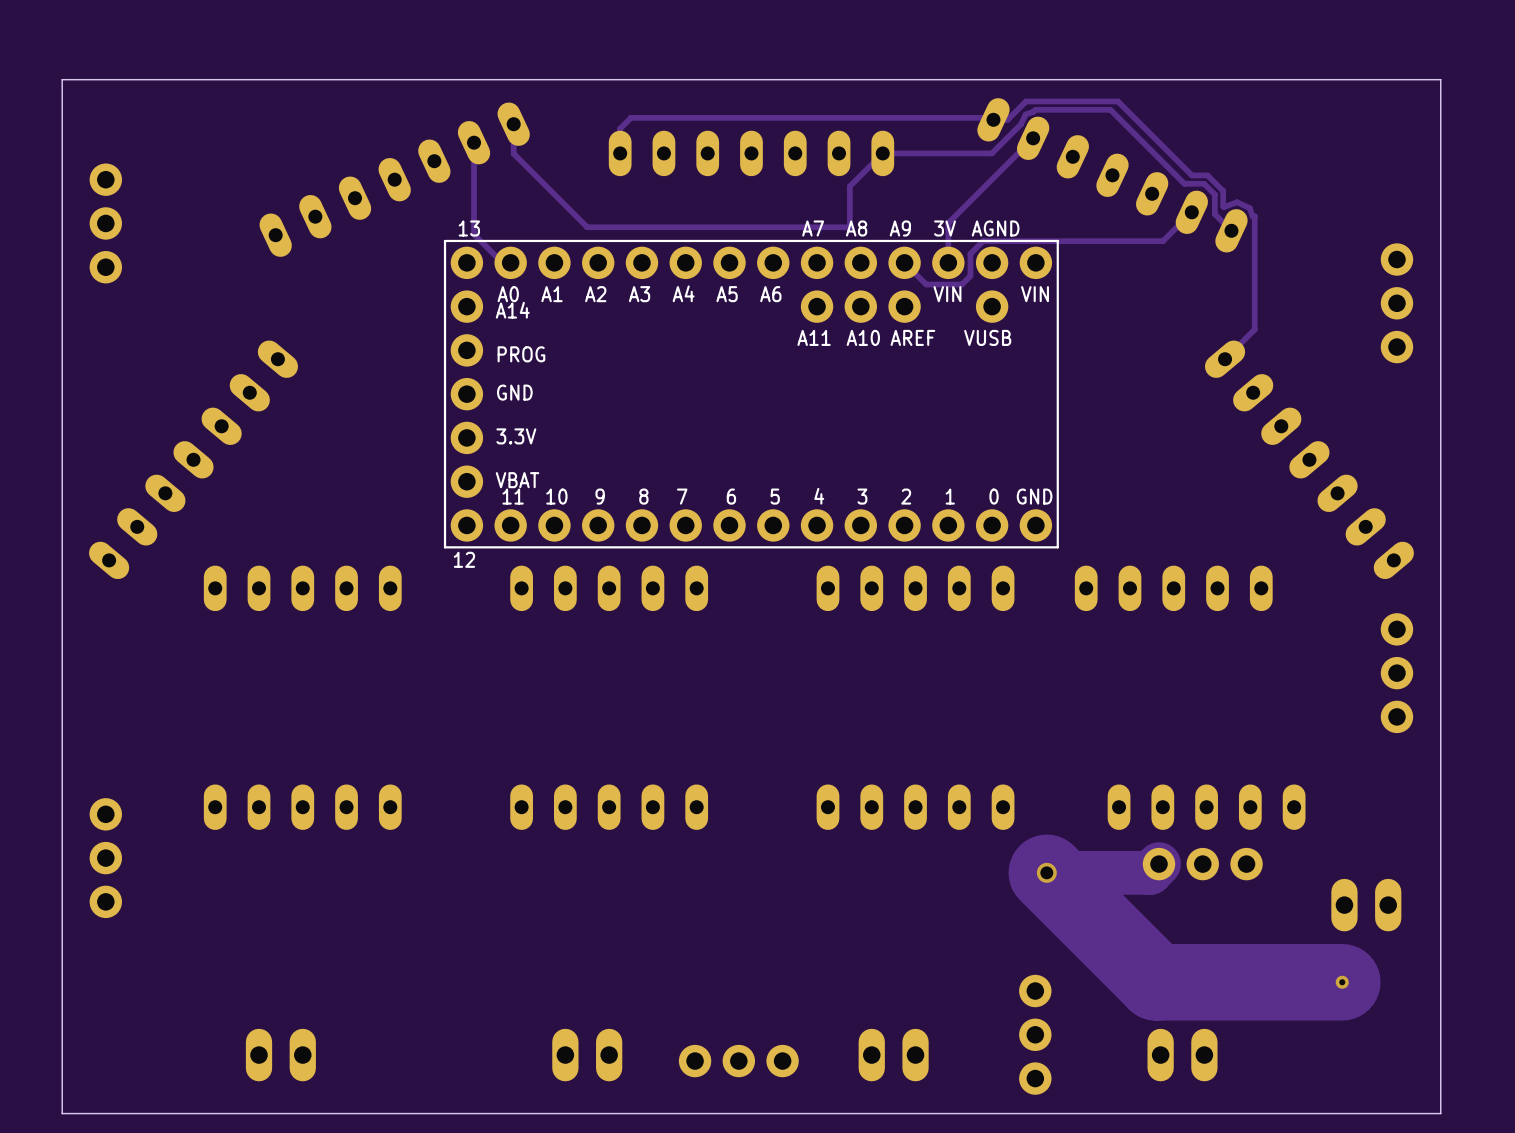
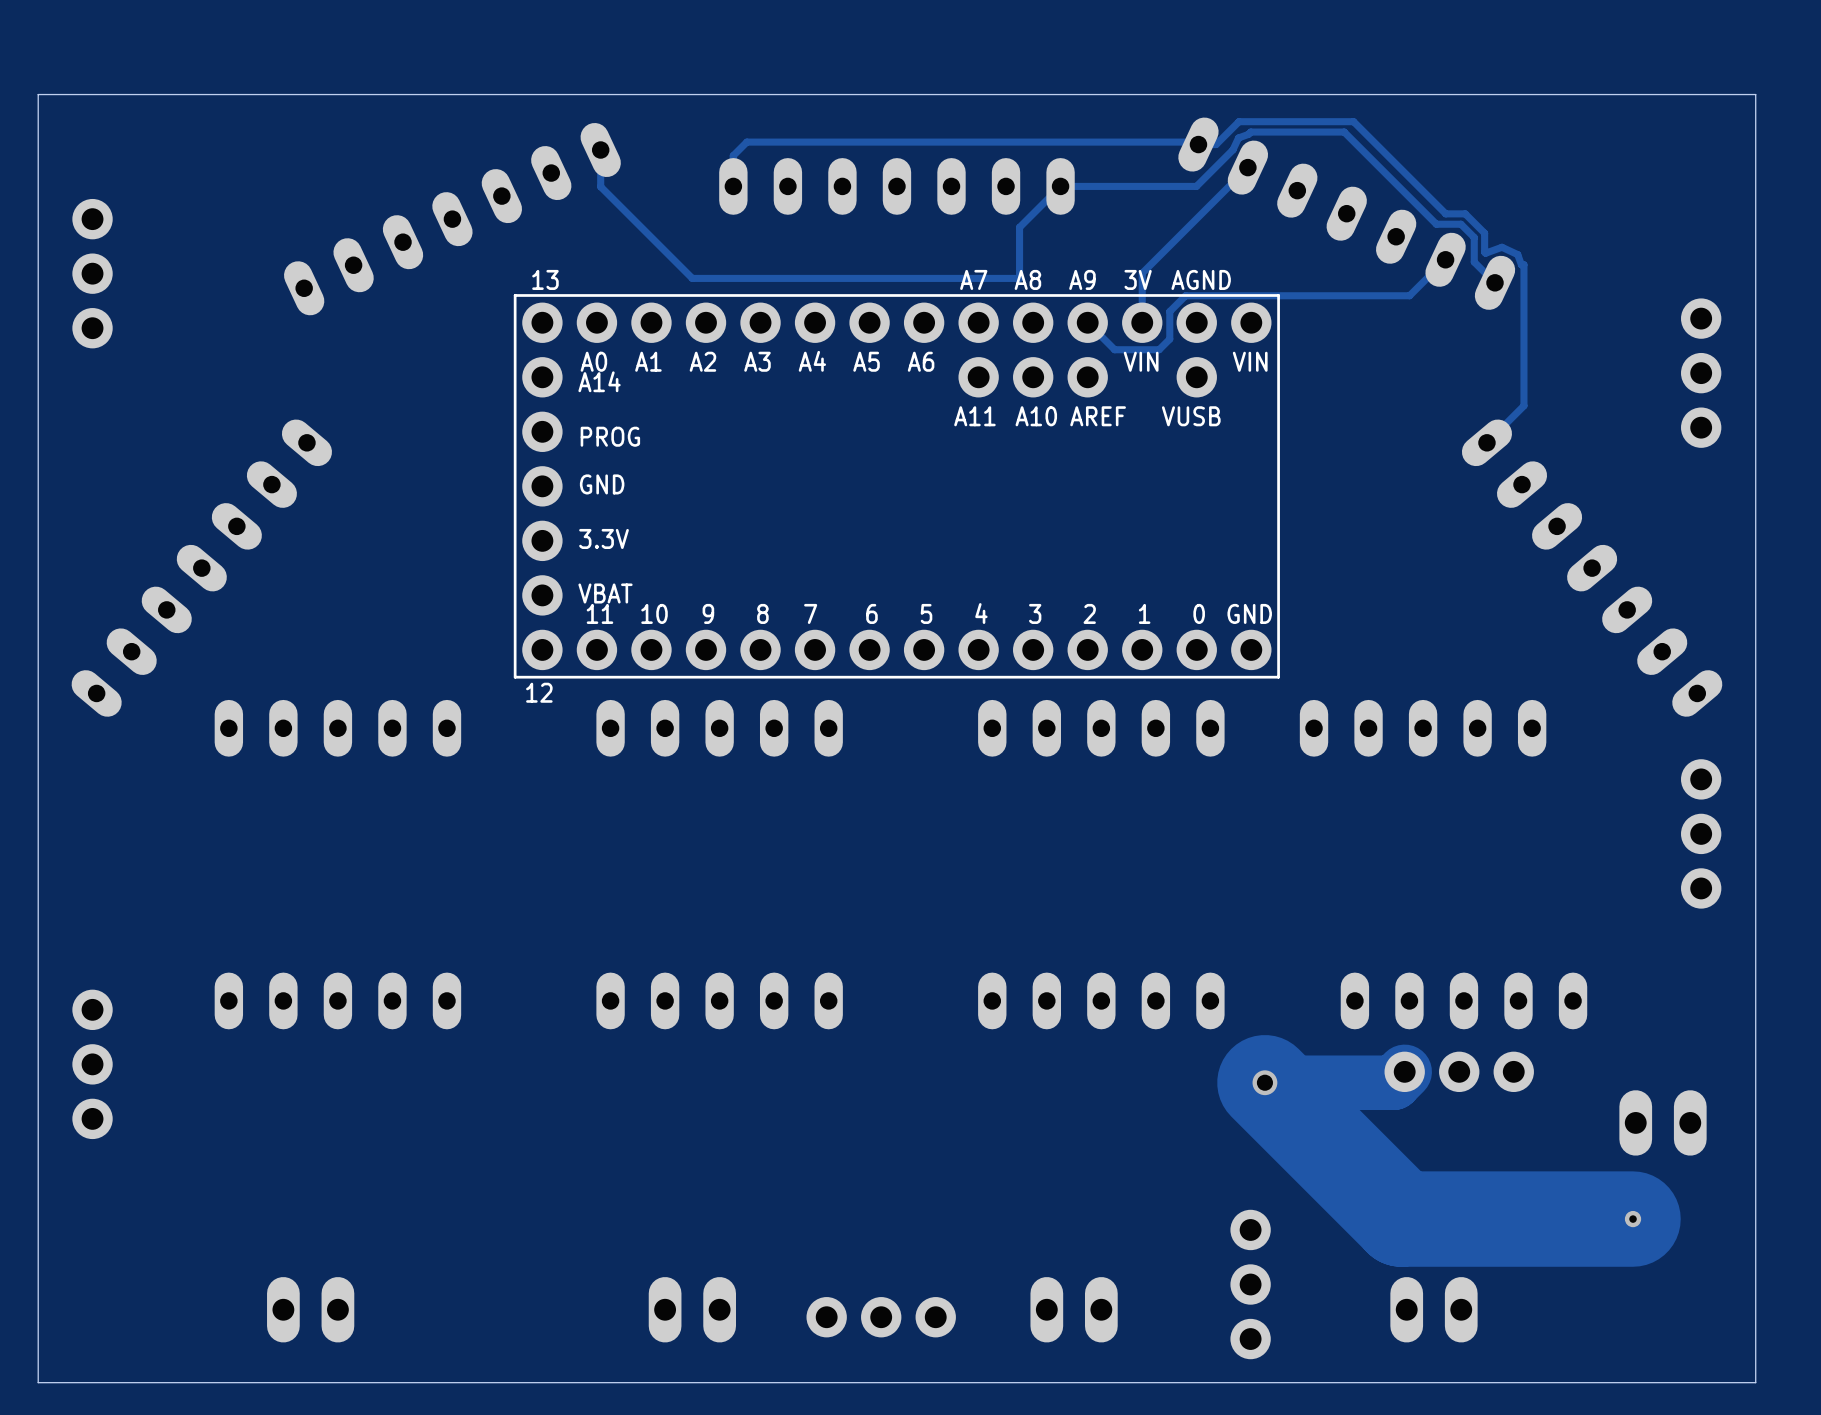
track: (474, 142) (474, 234) (502, 262) (510, 262) -> none

